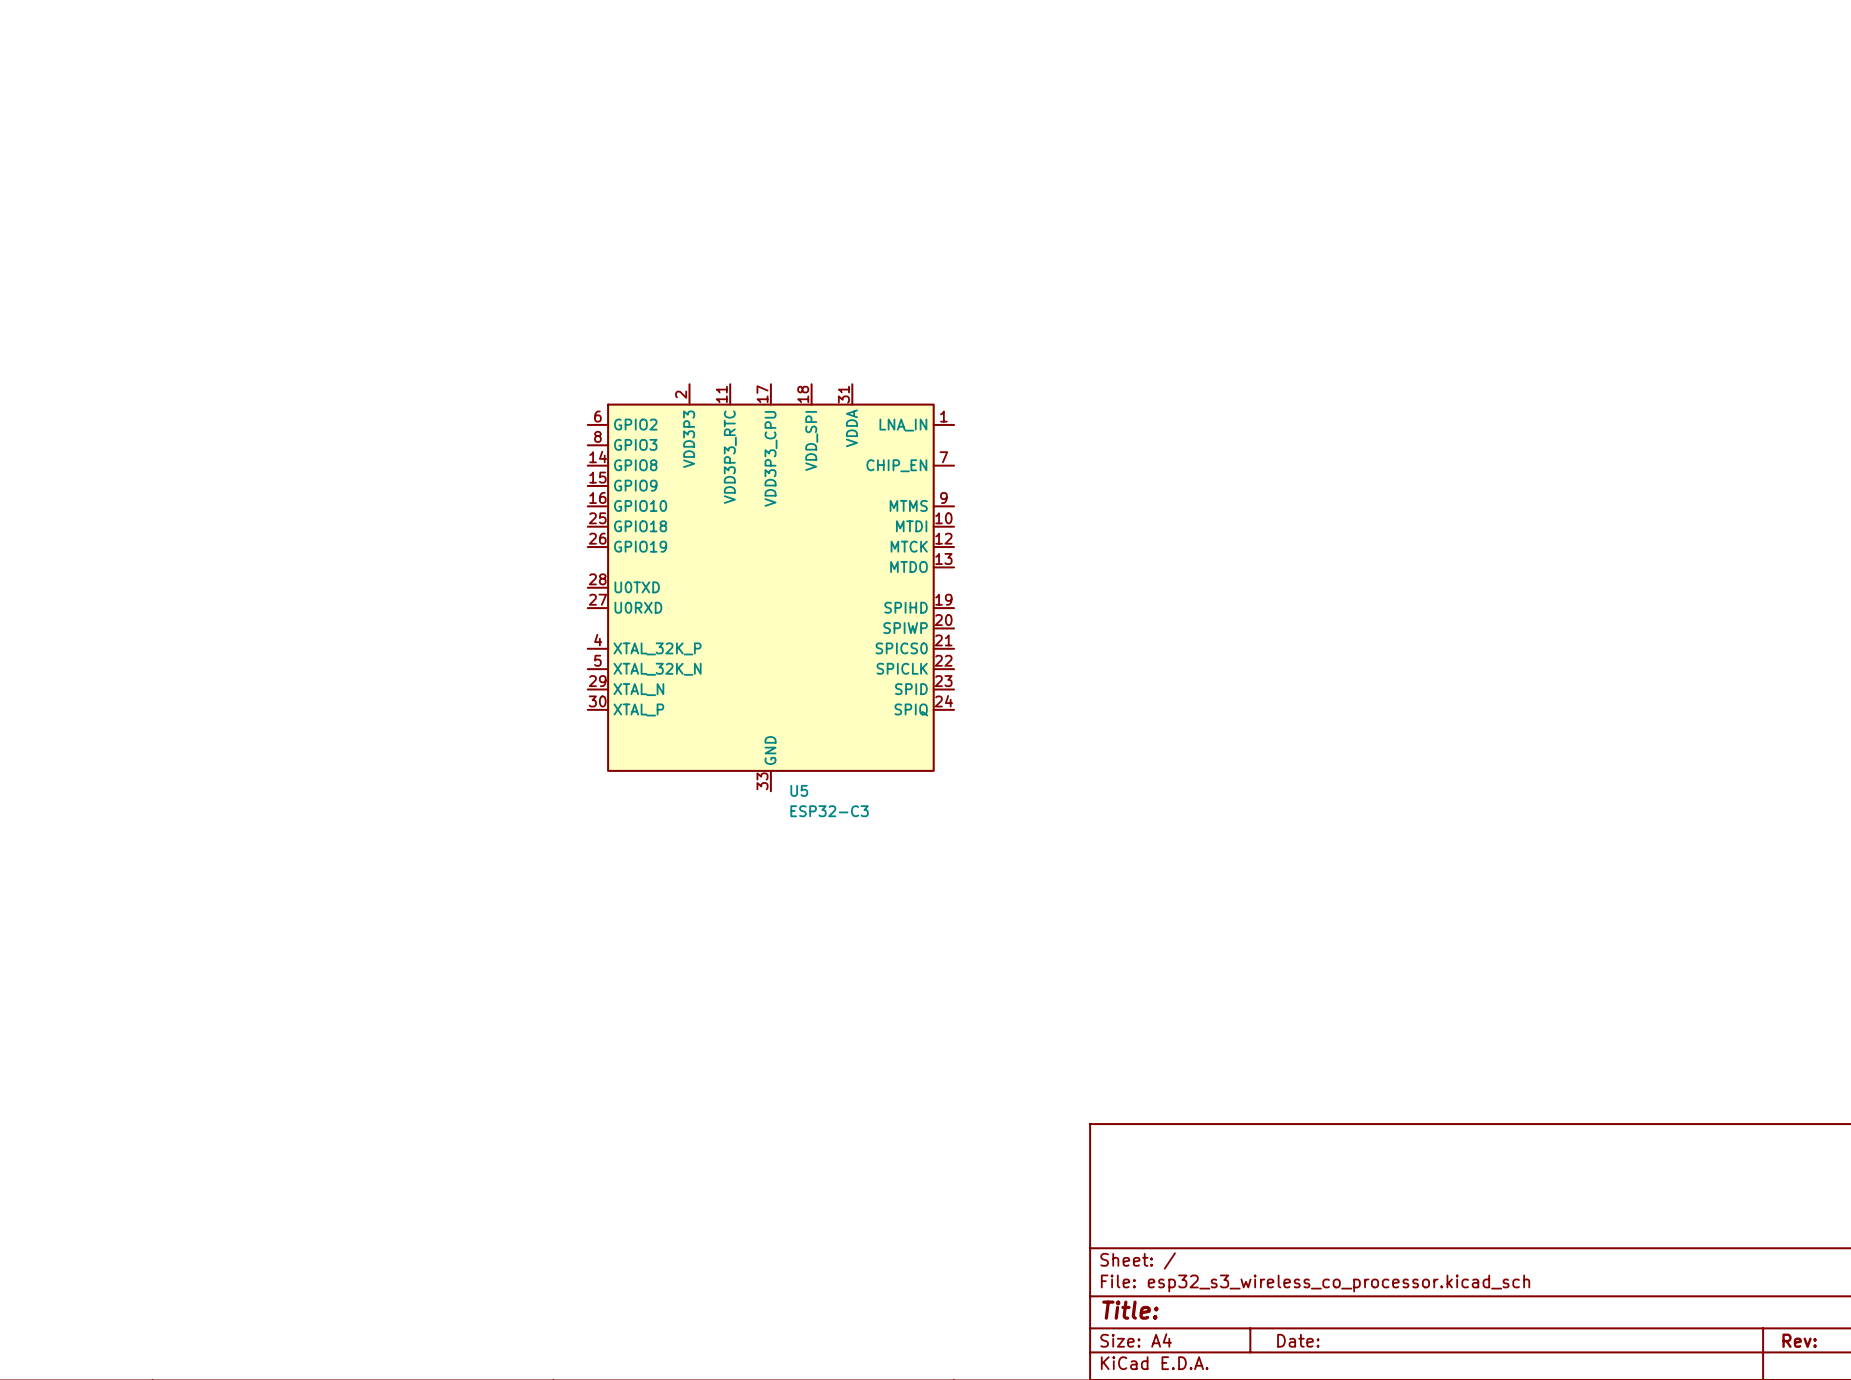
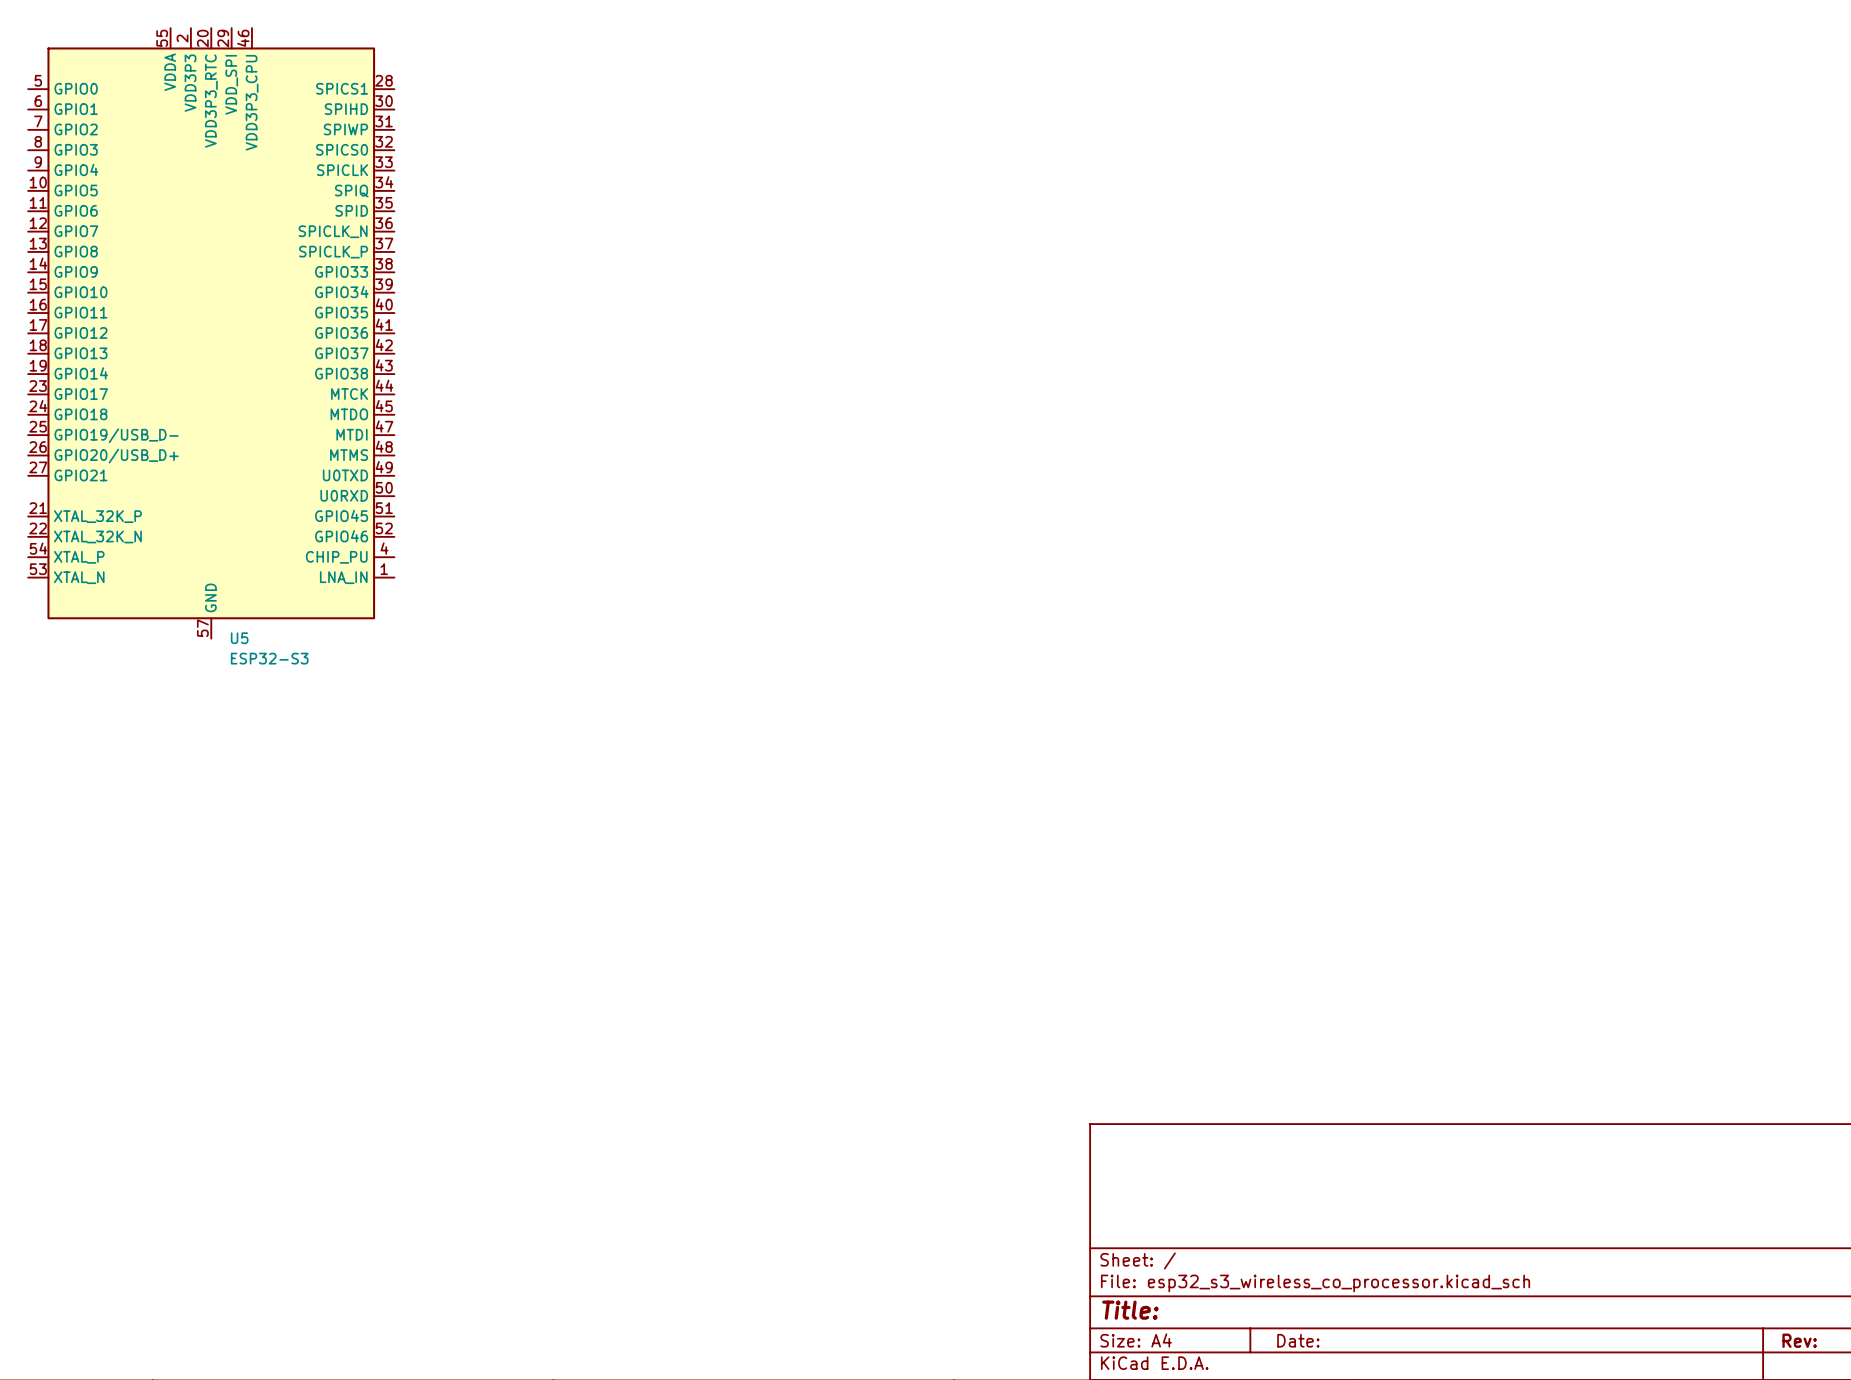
U5 symbol: [587, 384, 955, 792] -> [28, 28, 395, 639]
U5 name position: U5 (799, 790) -> U5 (239, 638)
U5 value: ESP32-C3 (829, 811) -> ESP32-S3 (269, 658)

